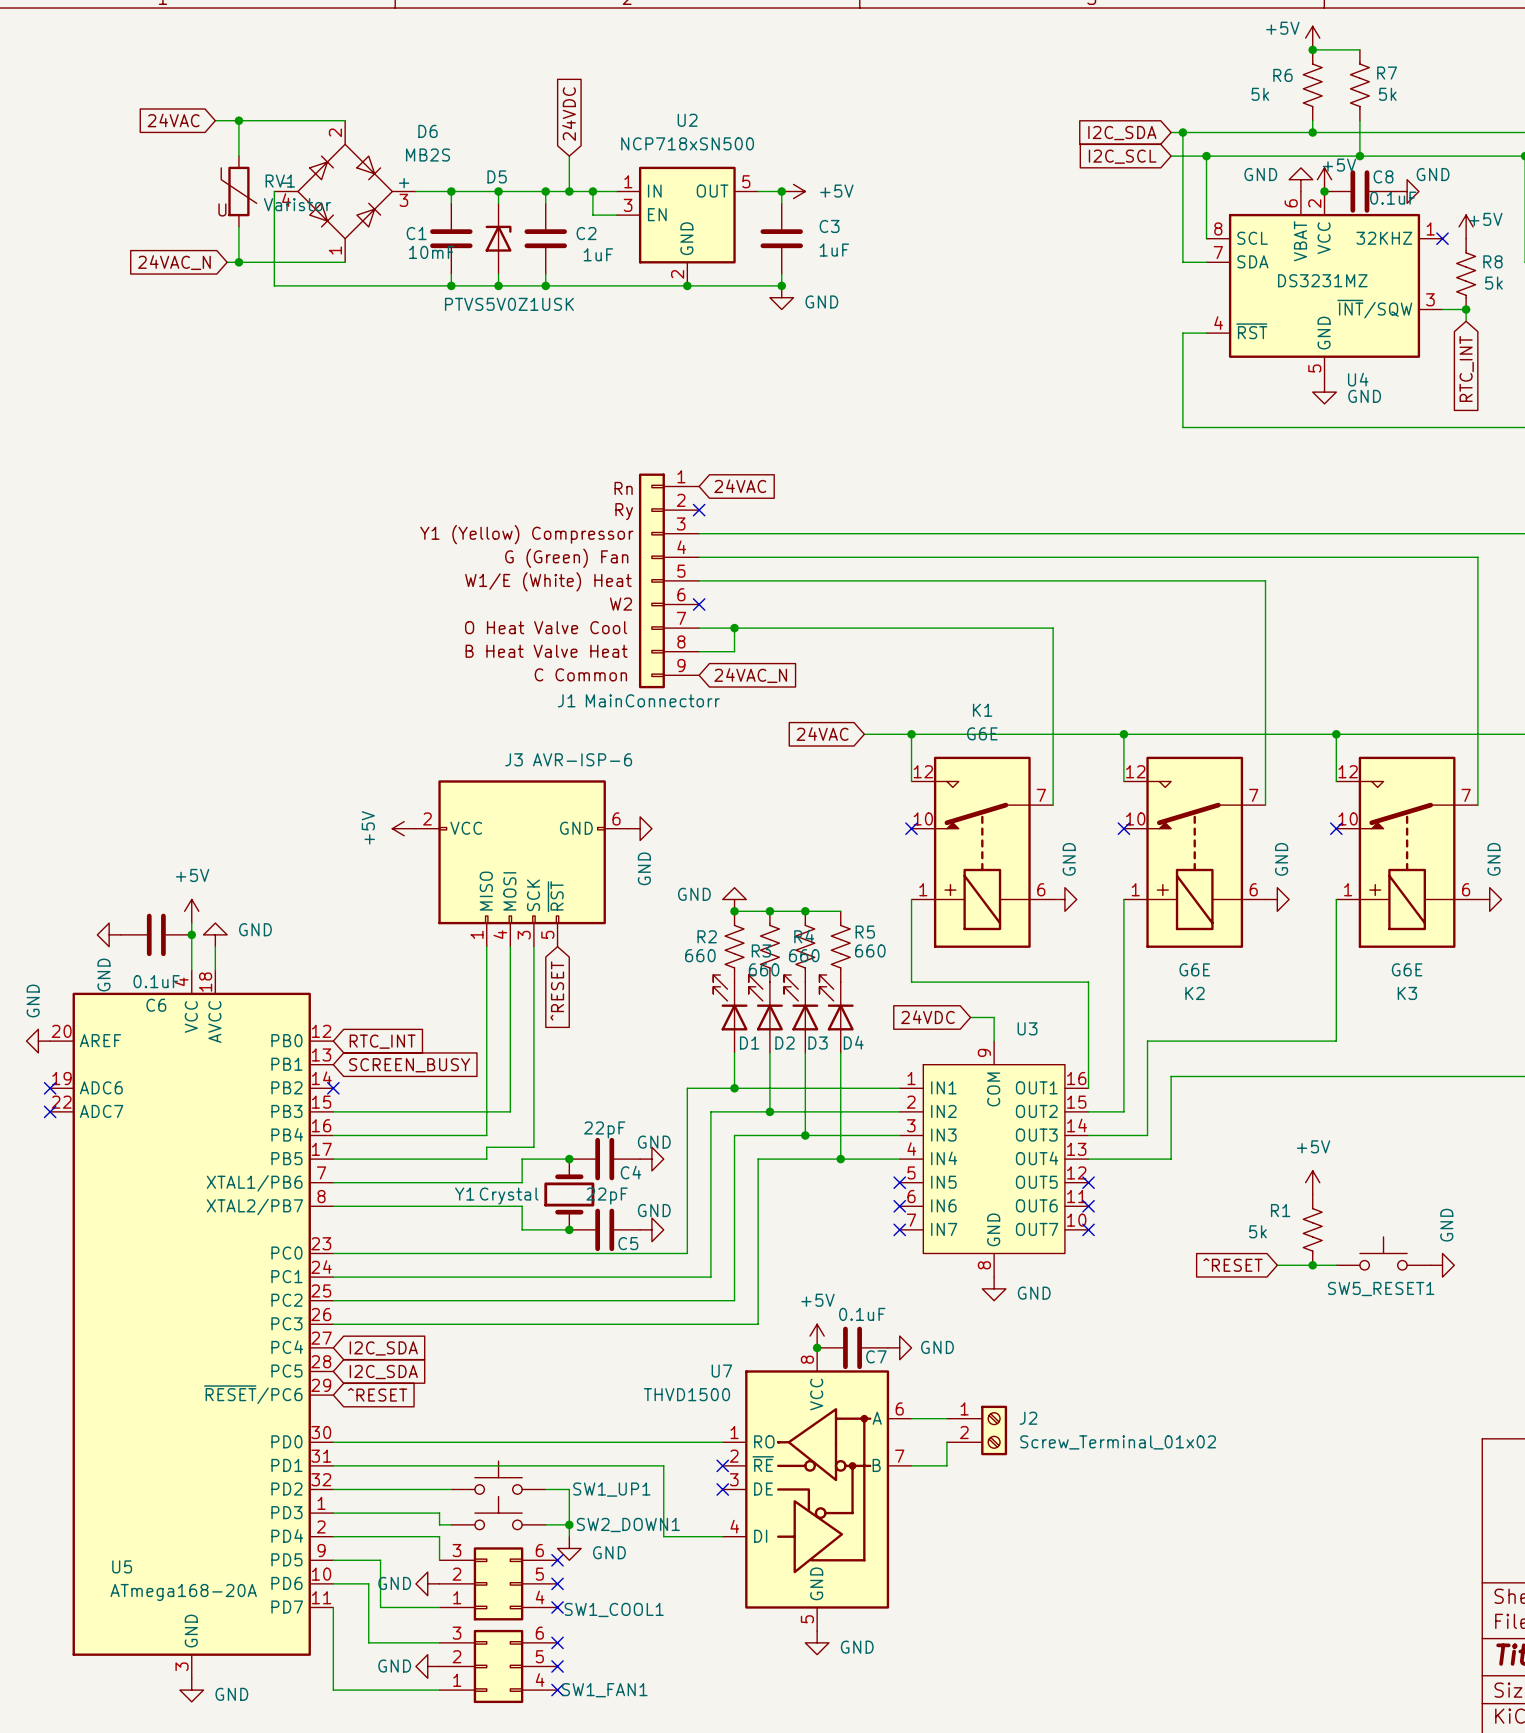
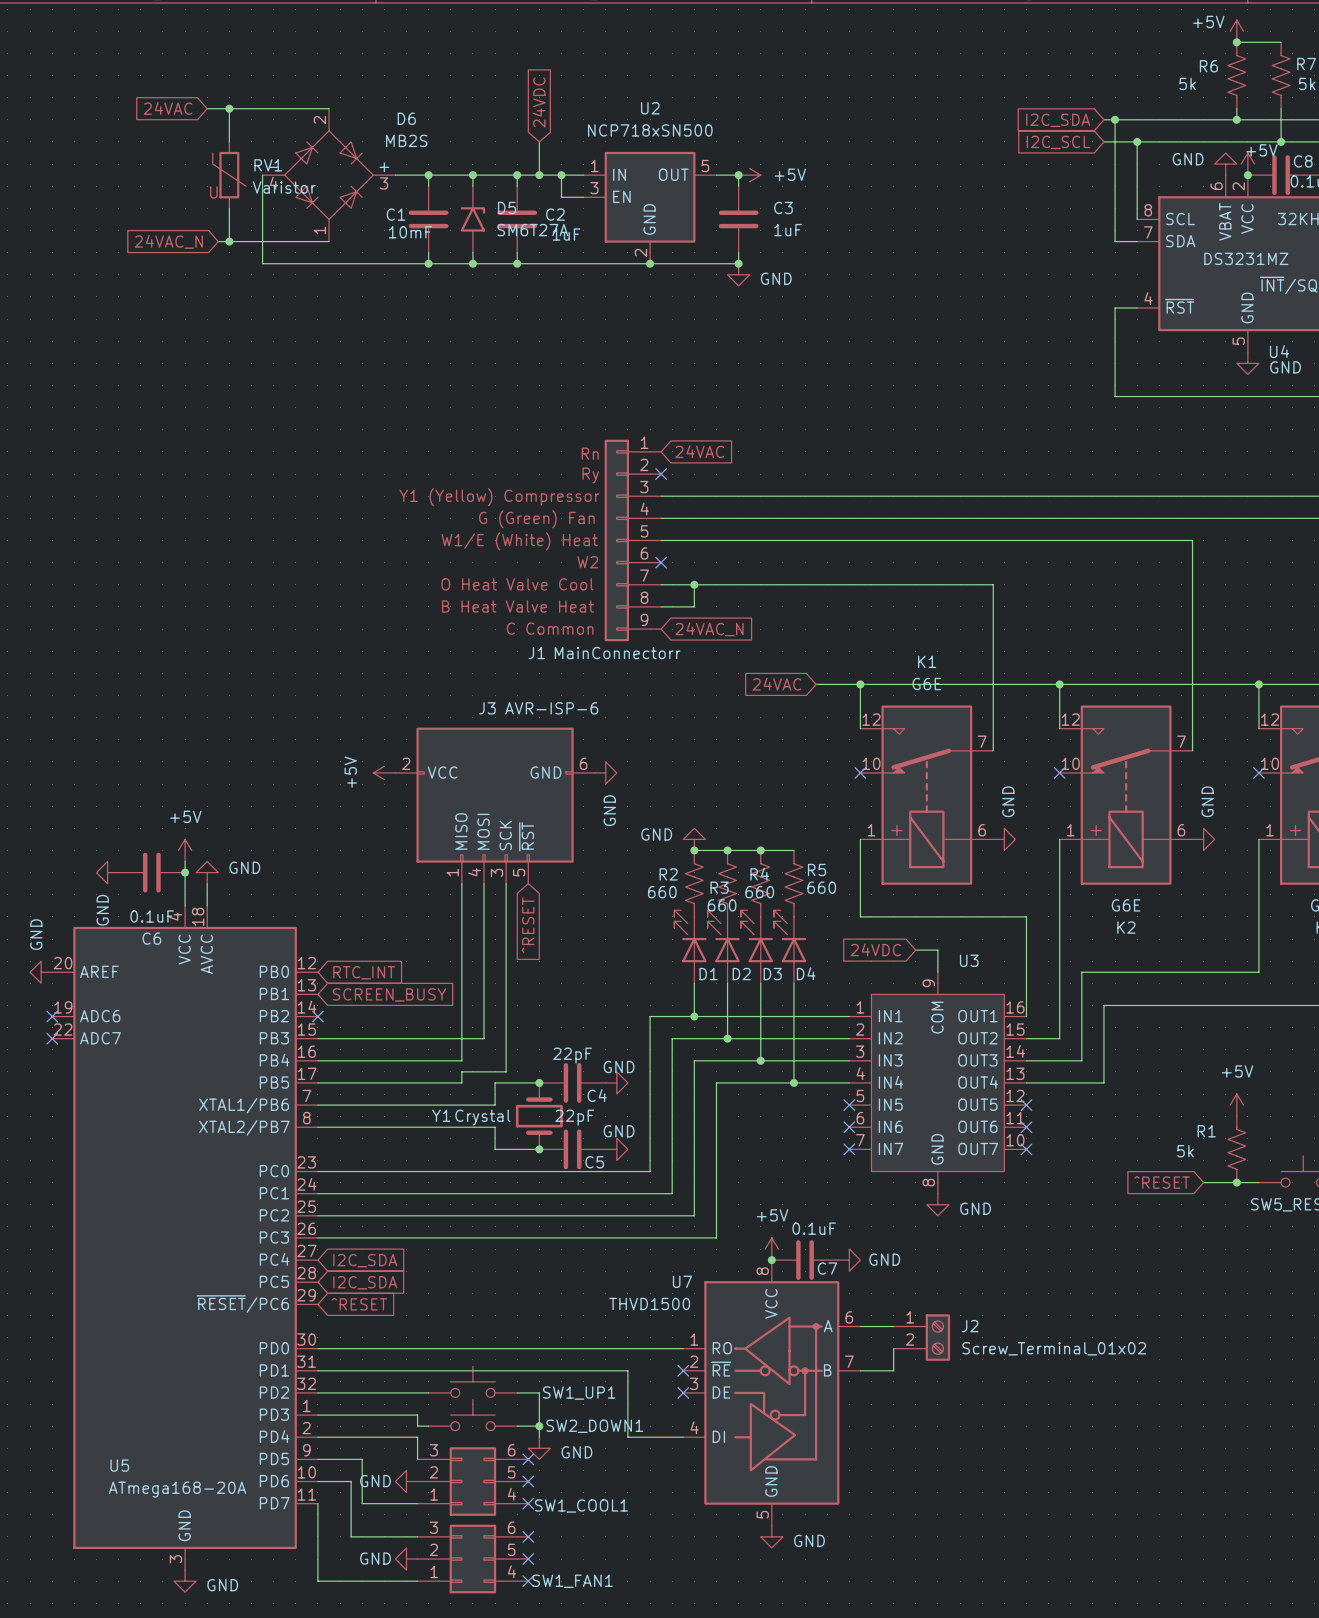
D5 name position: D5 (497, 176) -> D5 (507, 207)
D5 symbol: [485, 203, 512, 275] -> [460, 186, 486, 253]
D5 value: PTVS5V0Z1USK (509, 304) -> SM6T27A (532, 230)

